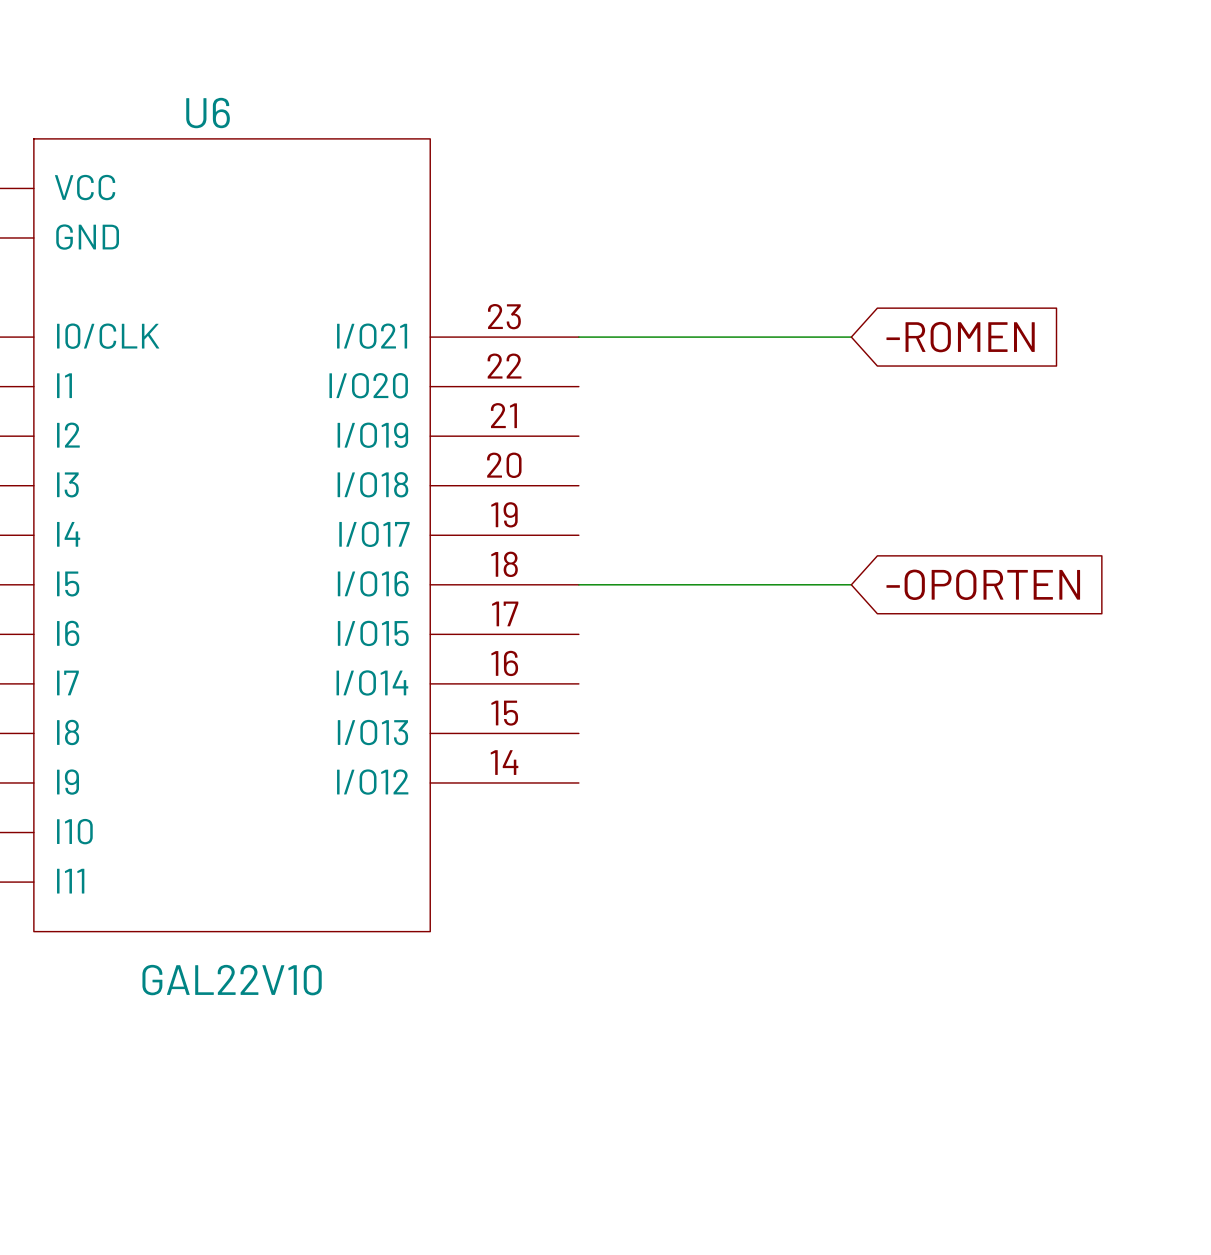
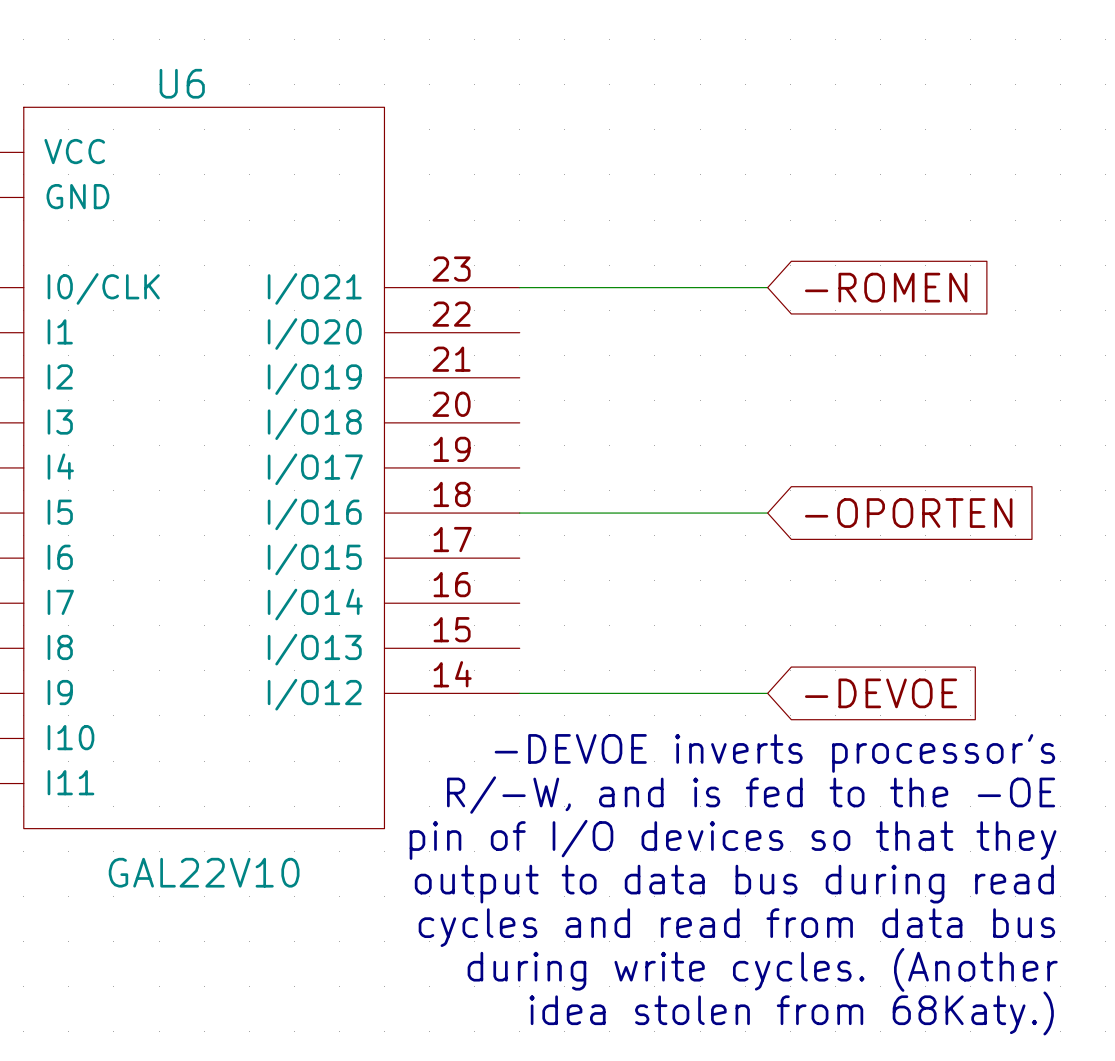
wire: none -> (519, 693) (767, 693)
global label: none -> -DEVOE (881, 693)
text: none -> -DEVOE inverts processor's (774, 753)
text: none -> R/-W, and is fed to the -OE (751, 795)
text: none -> pin of I/O devices so that they (733, 839)
text: none -> output to data bus during read (734, 884)
text: none -> cycles and read from data bus (736, 927)
text: none -> during write cycles. (Another (762, 969)
text: none -> idea stolen from 68Katy.) (791, 1013)

